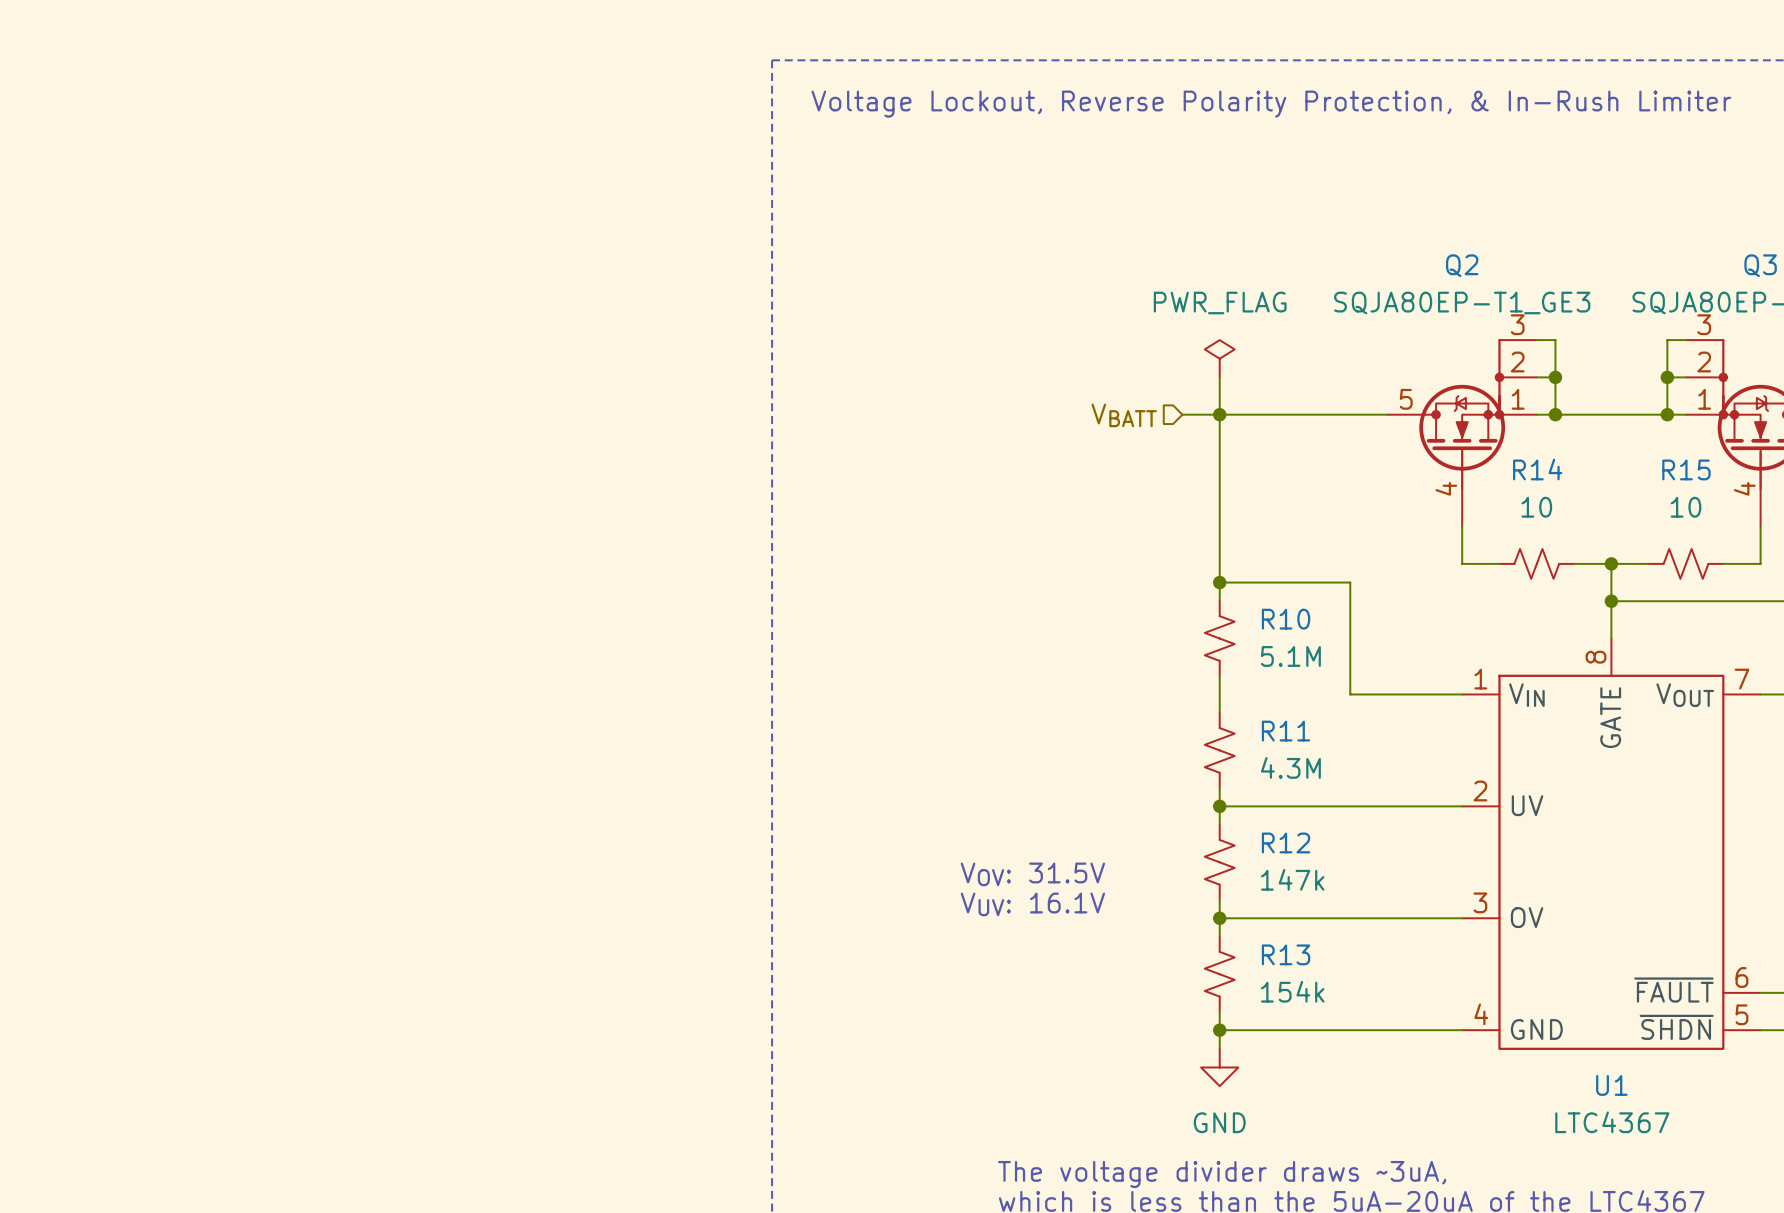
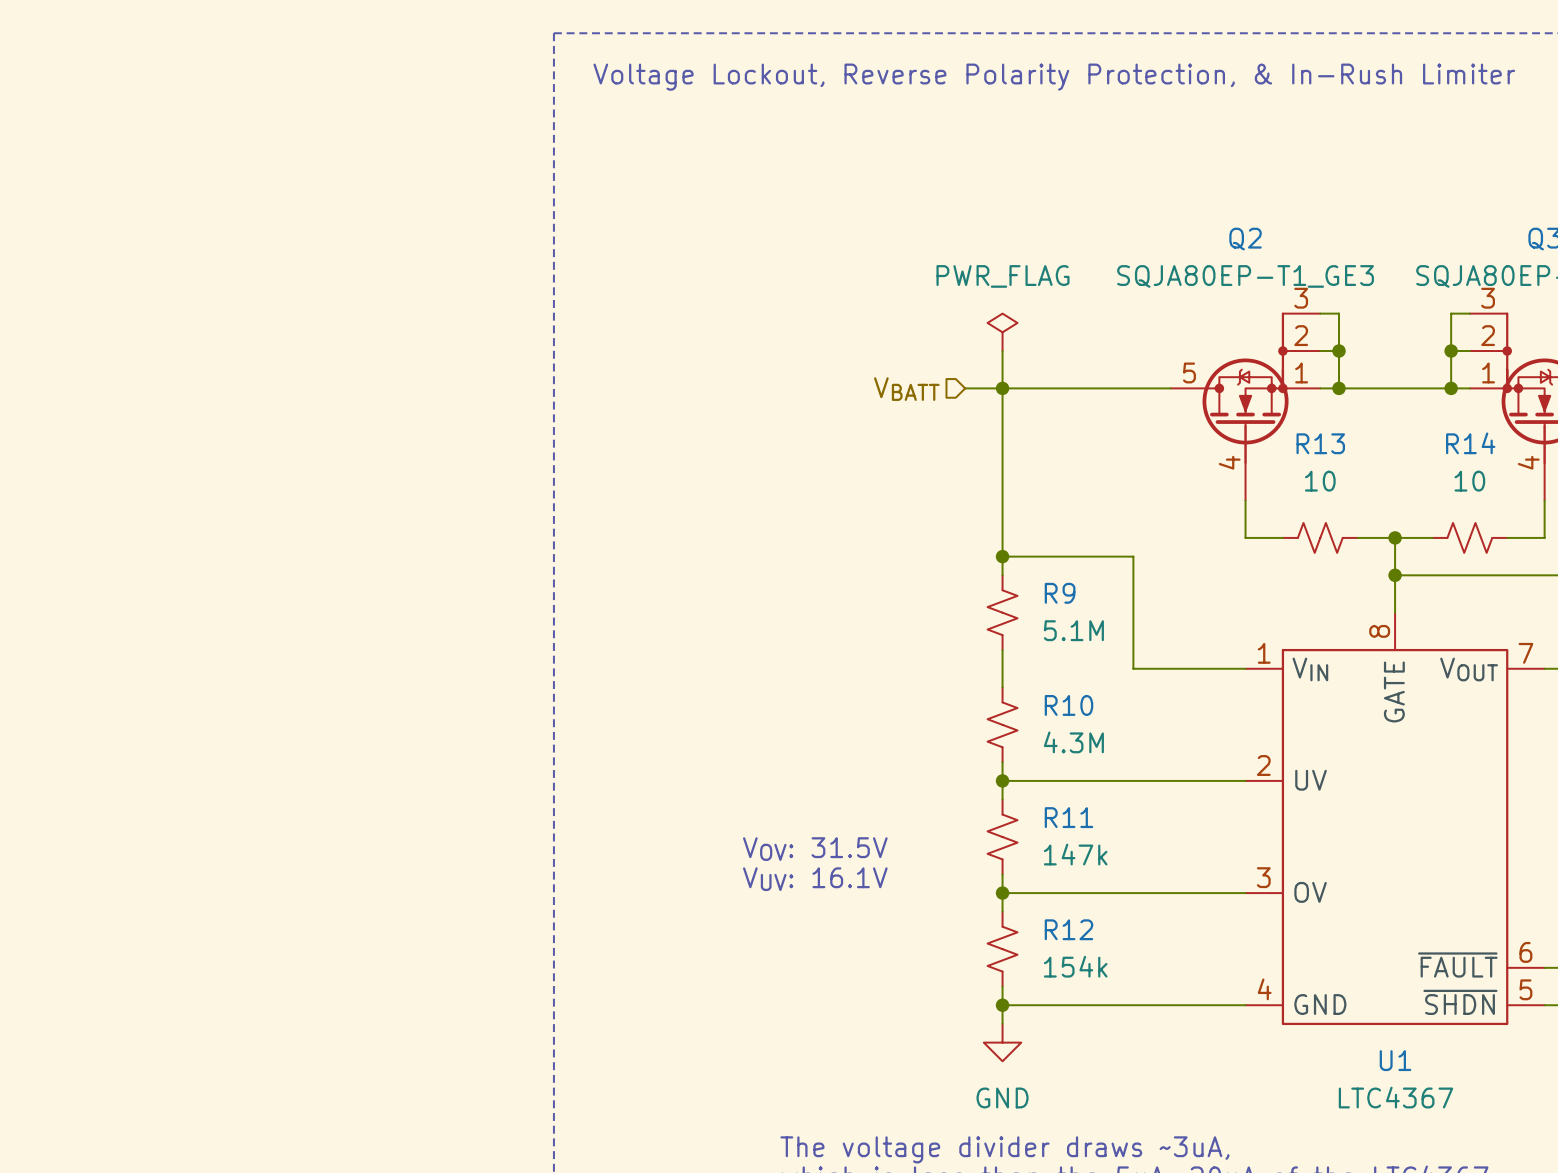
R14 name: R14 (1537, 469) -> R13 (1320, 443)
R15 name: R15 (1686, 469) -> R14 (1470, 443)
R10 name: R10 (1286, 619) -> R9 (1060, 593)
R11 name: R11 (1286, 731) -> R10 (1069, 705)
R12 name: R12 (1286, 842) -> R11 (1069, 817)
R13 name: R13 (1286, 954) -> R12 (1069, 929)

